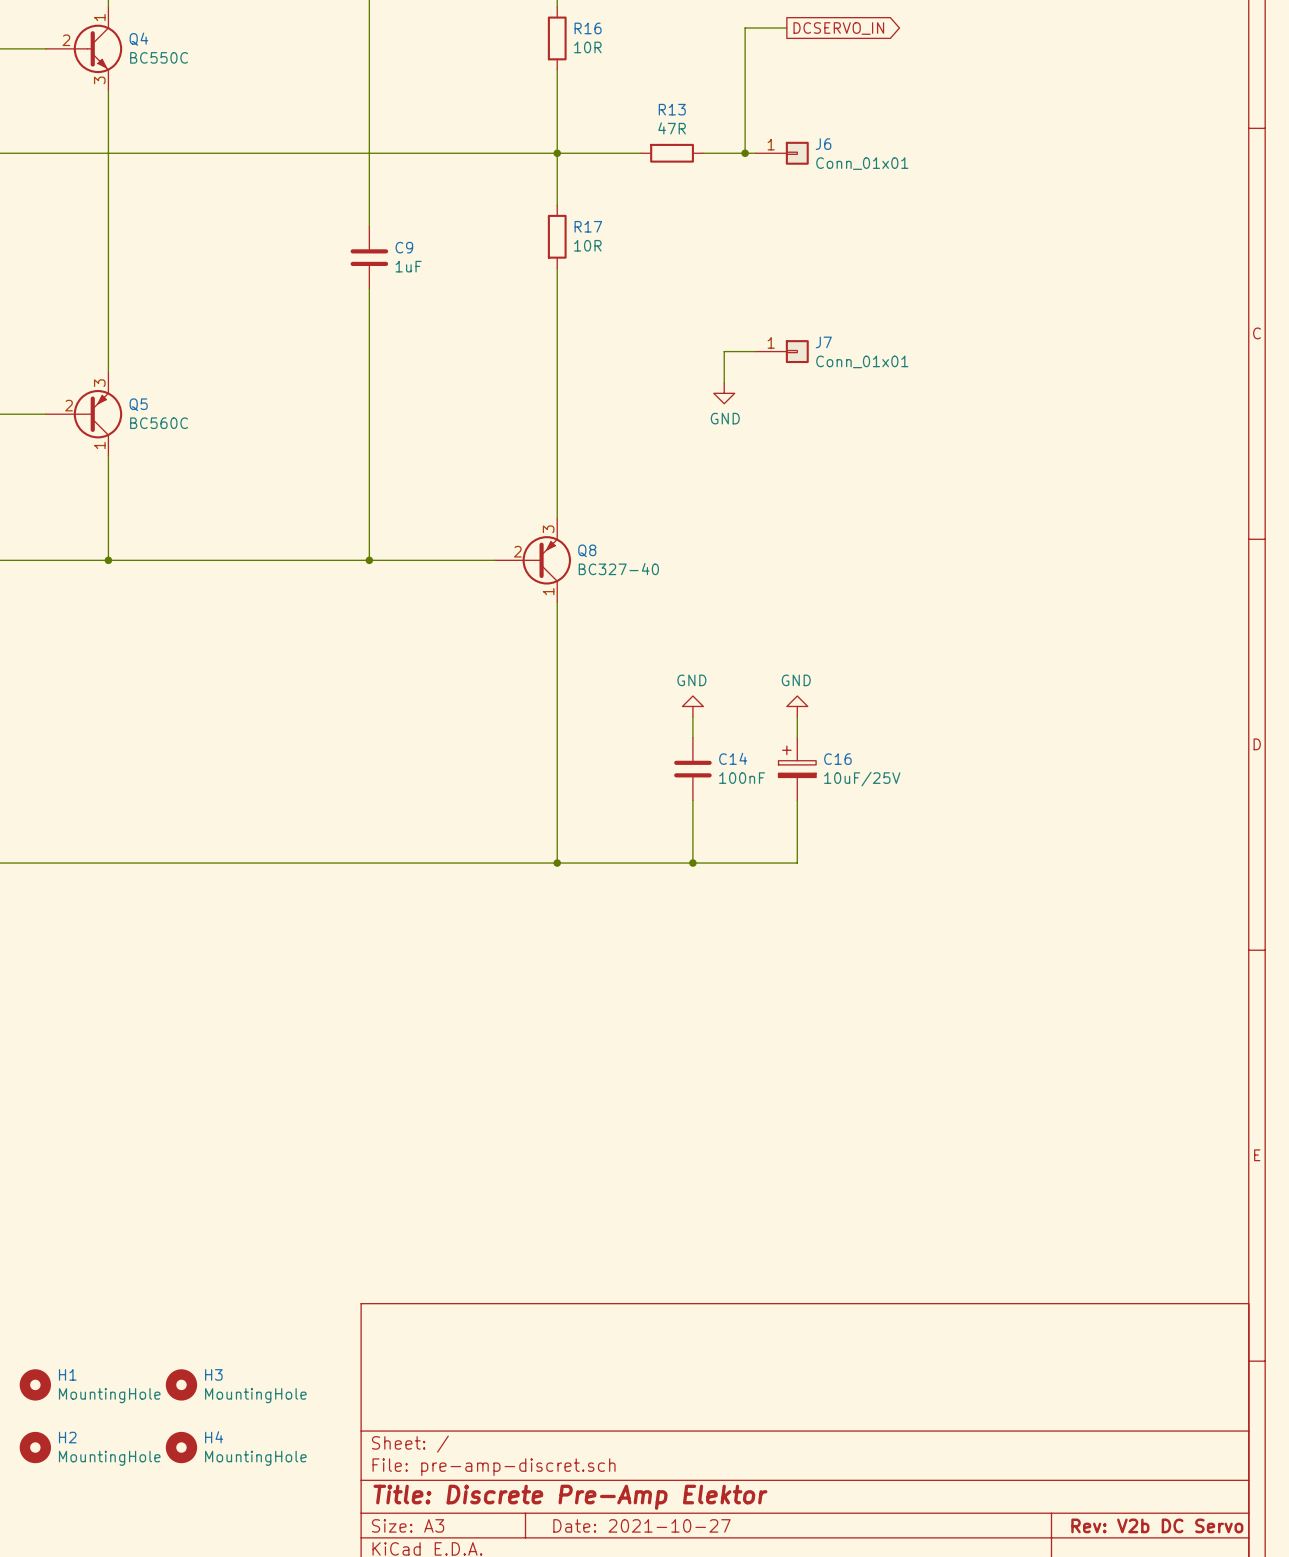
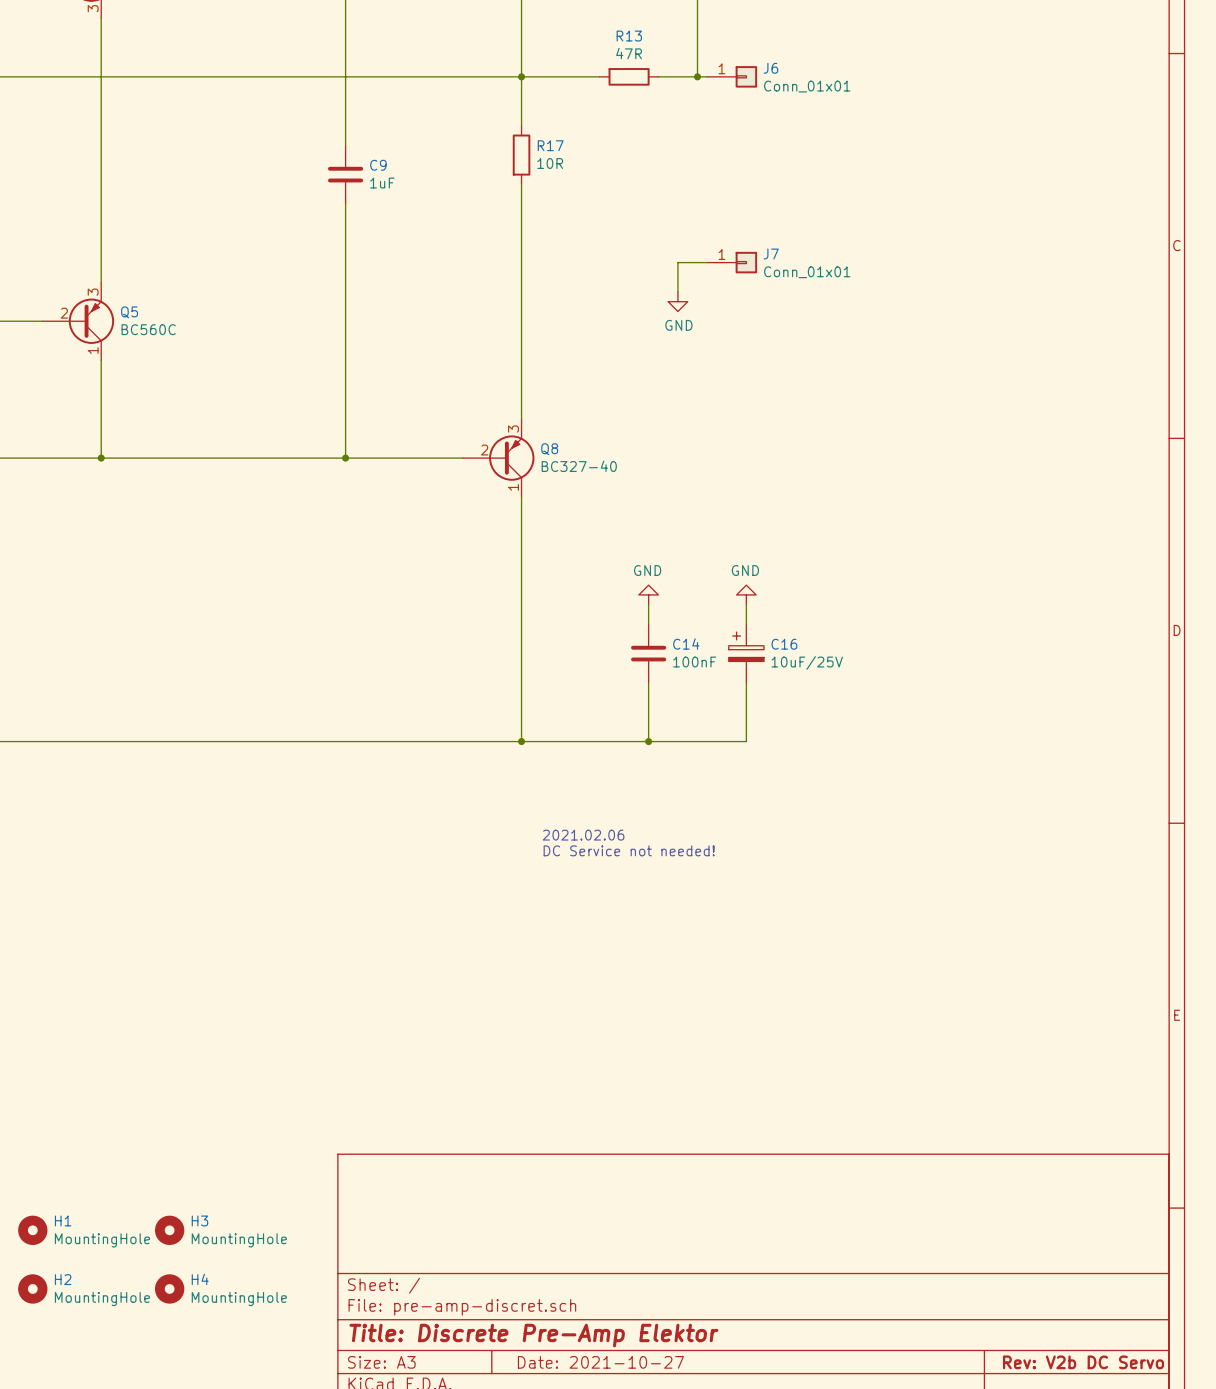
text: none -> 2021.02.06 (583, 835)
text: none -> DC Service not needed! (629, 850)

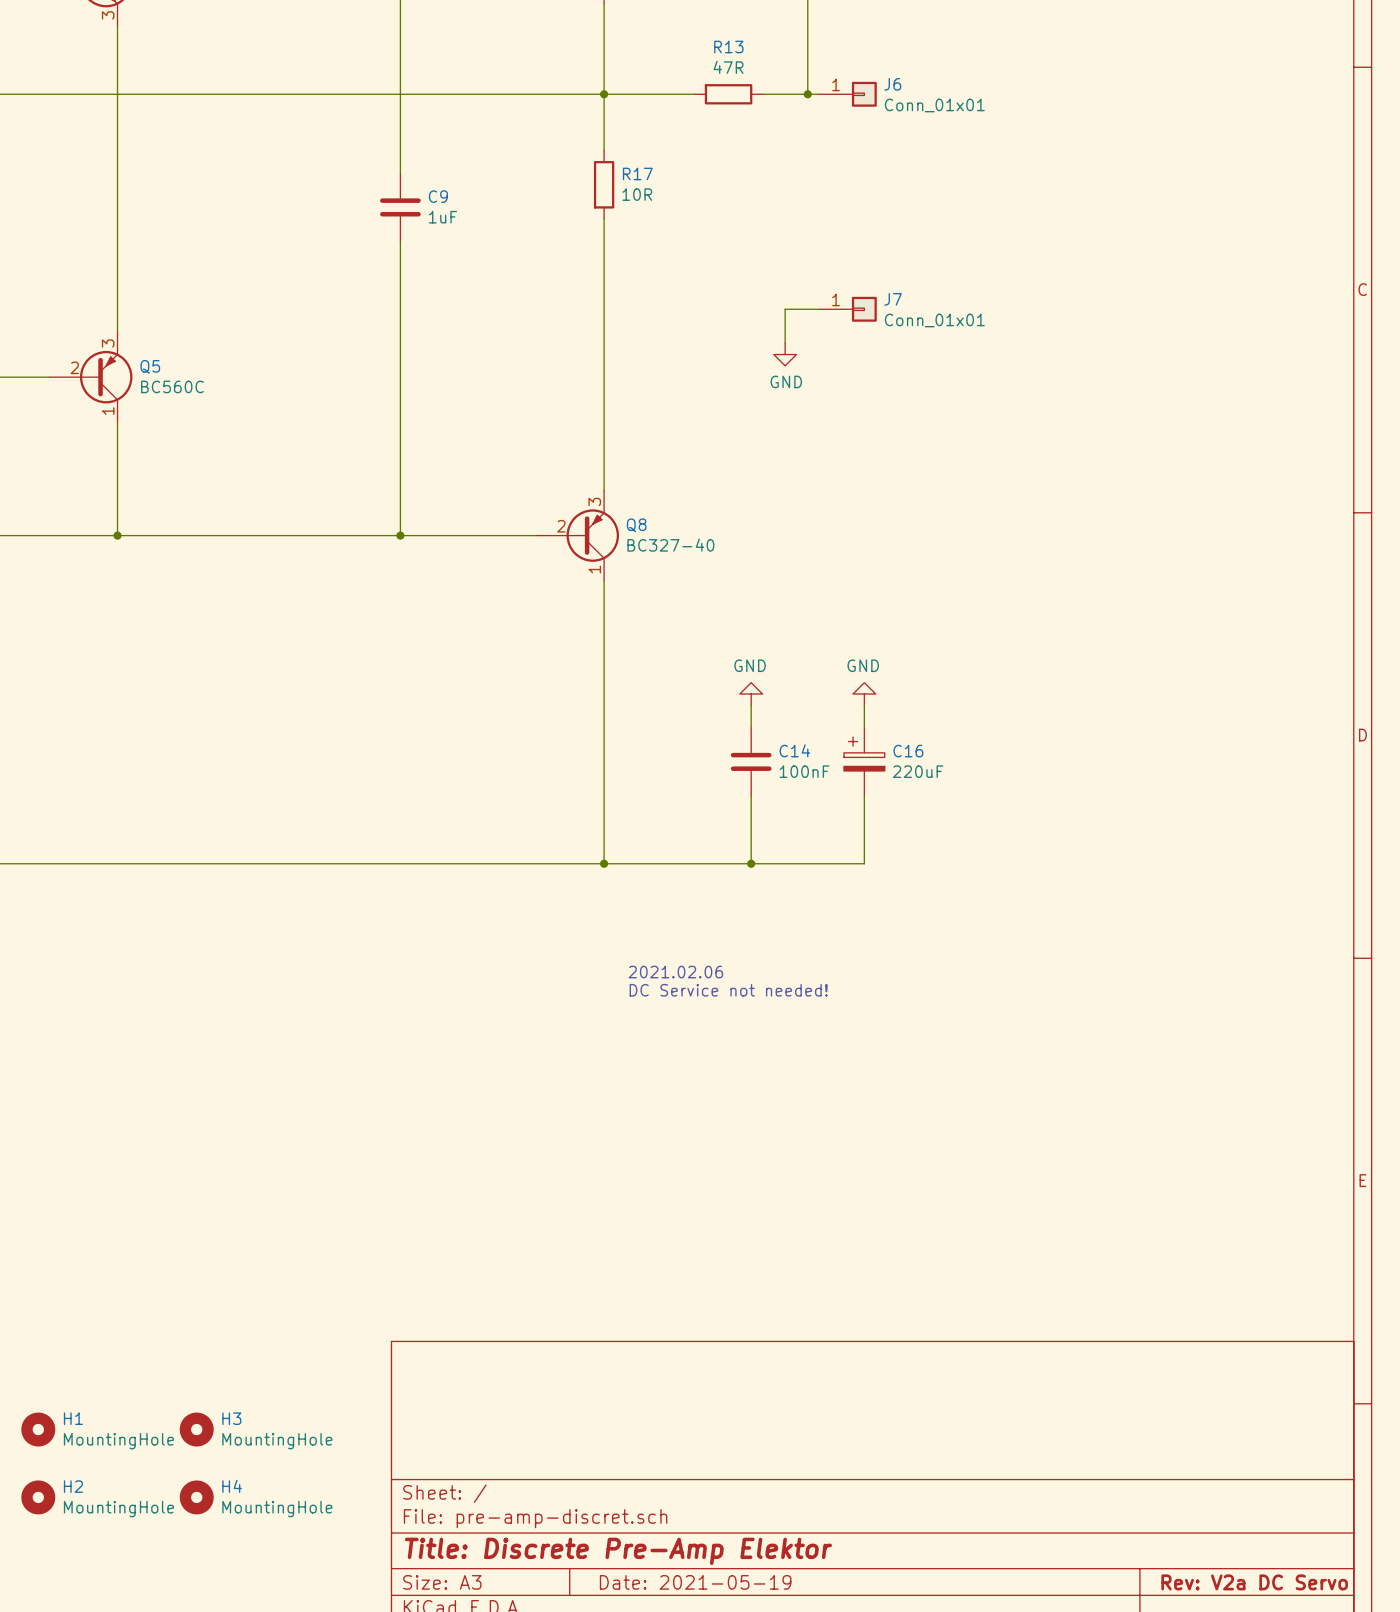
C16 value: 10uF/25V (807, 662) -> 220uF (918, 771)
title block: Date: 2021-10-27 (600, 1362) -> Date: 2021-05-19 (695, 1582)
title block: Rev: V2b DC Servo (1083, 1362) -> Rev: V2a DC Servo (1254, 1582)

